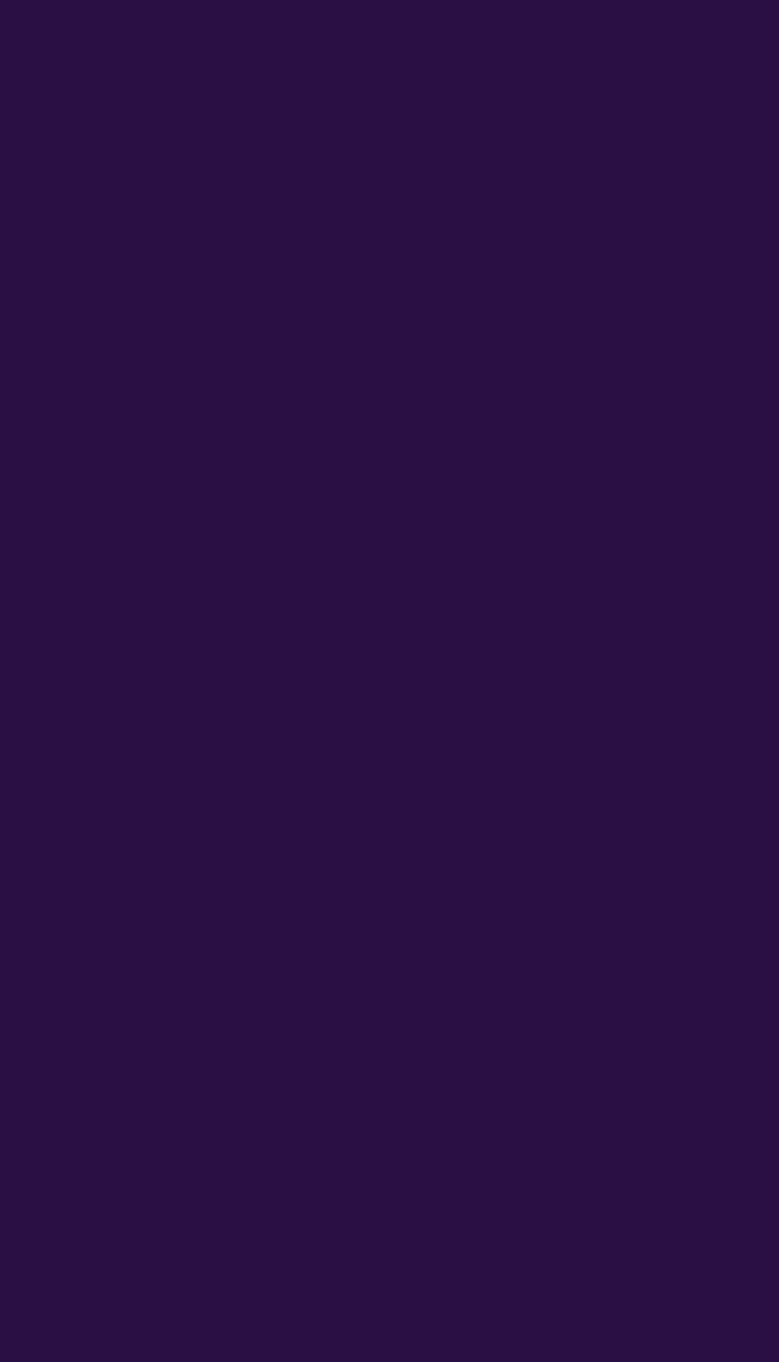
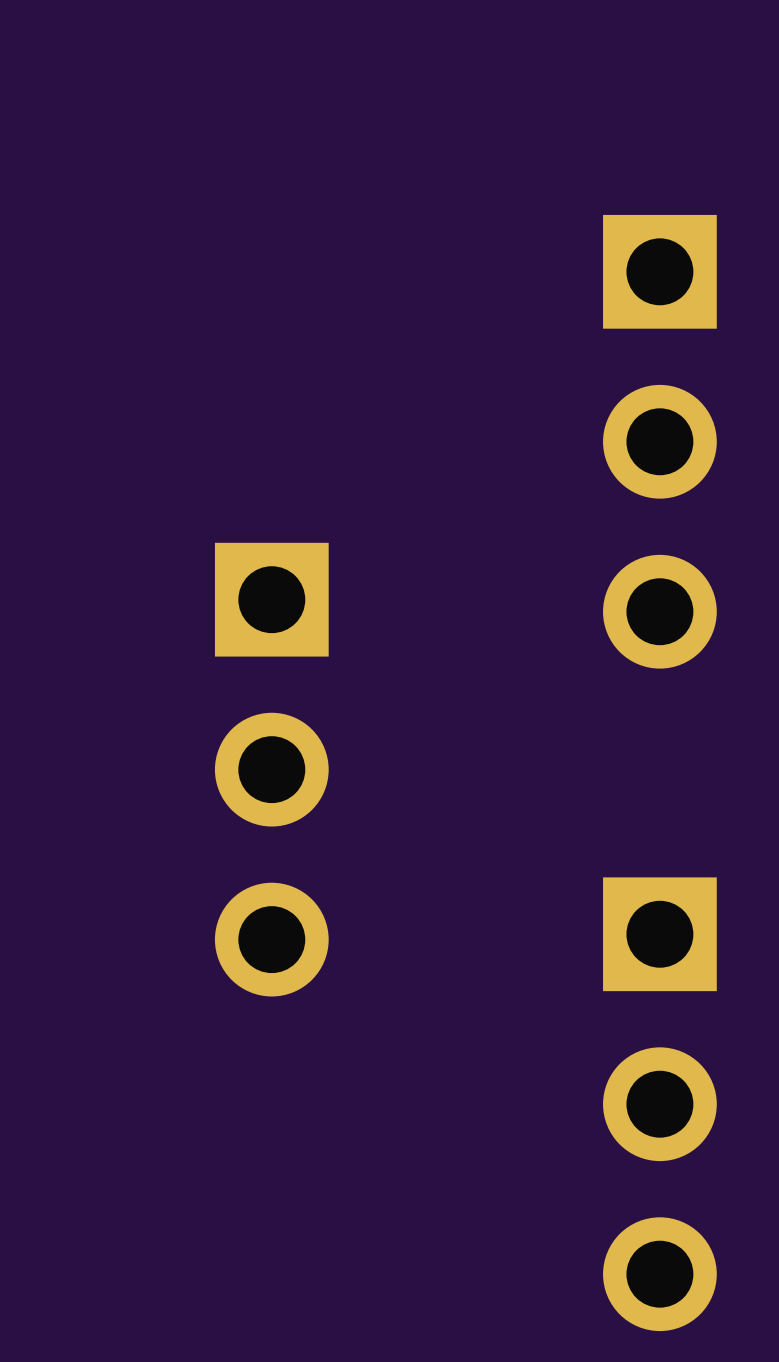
part: none -> (659, 441)
part: none -> (271, 769)
part: none -> (659, 1104)

